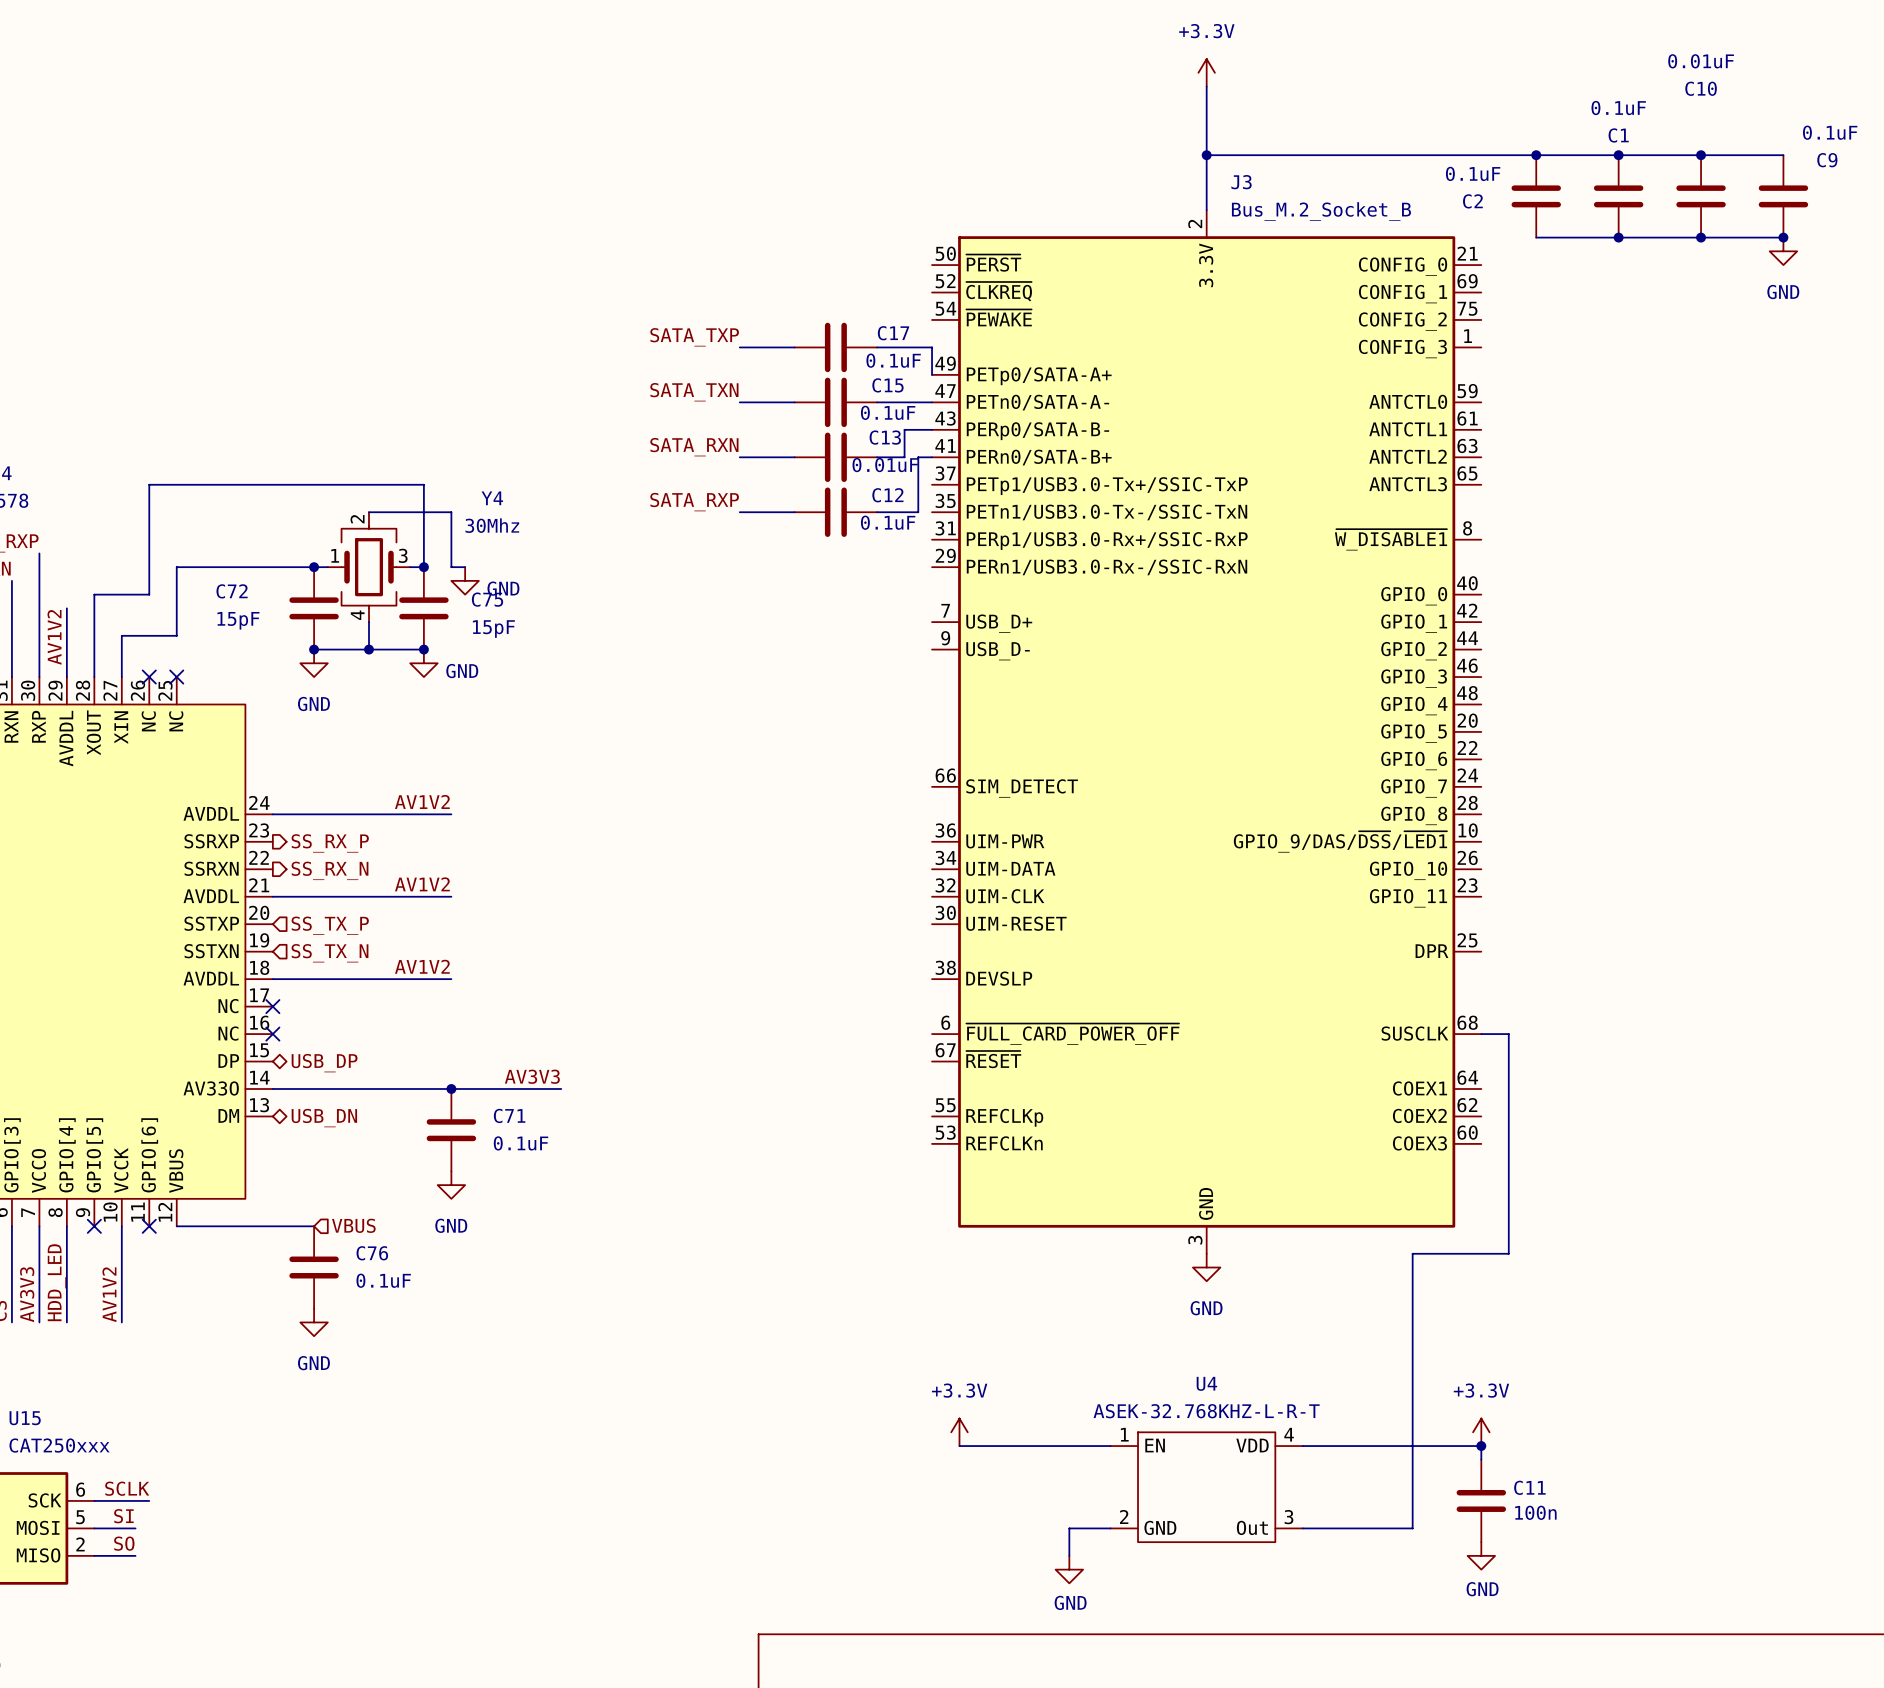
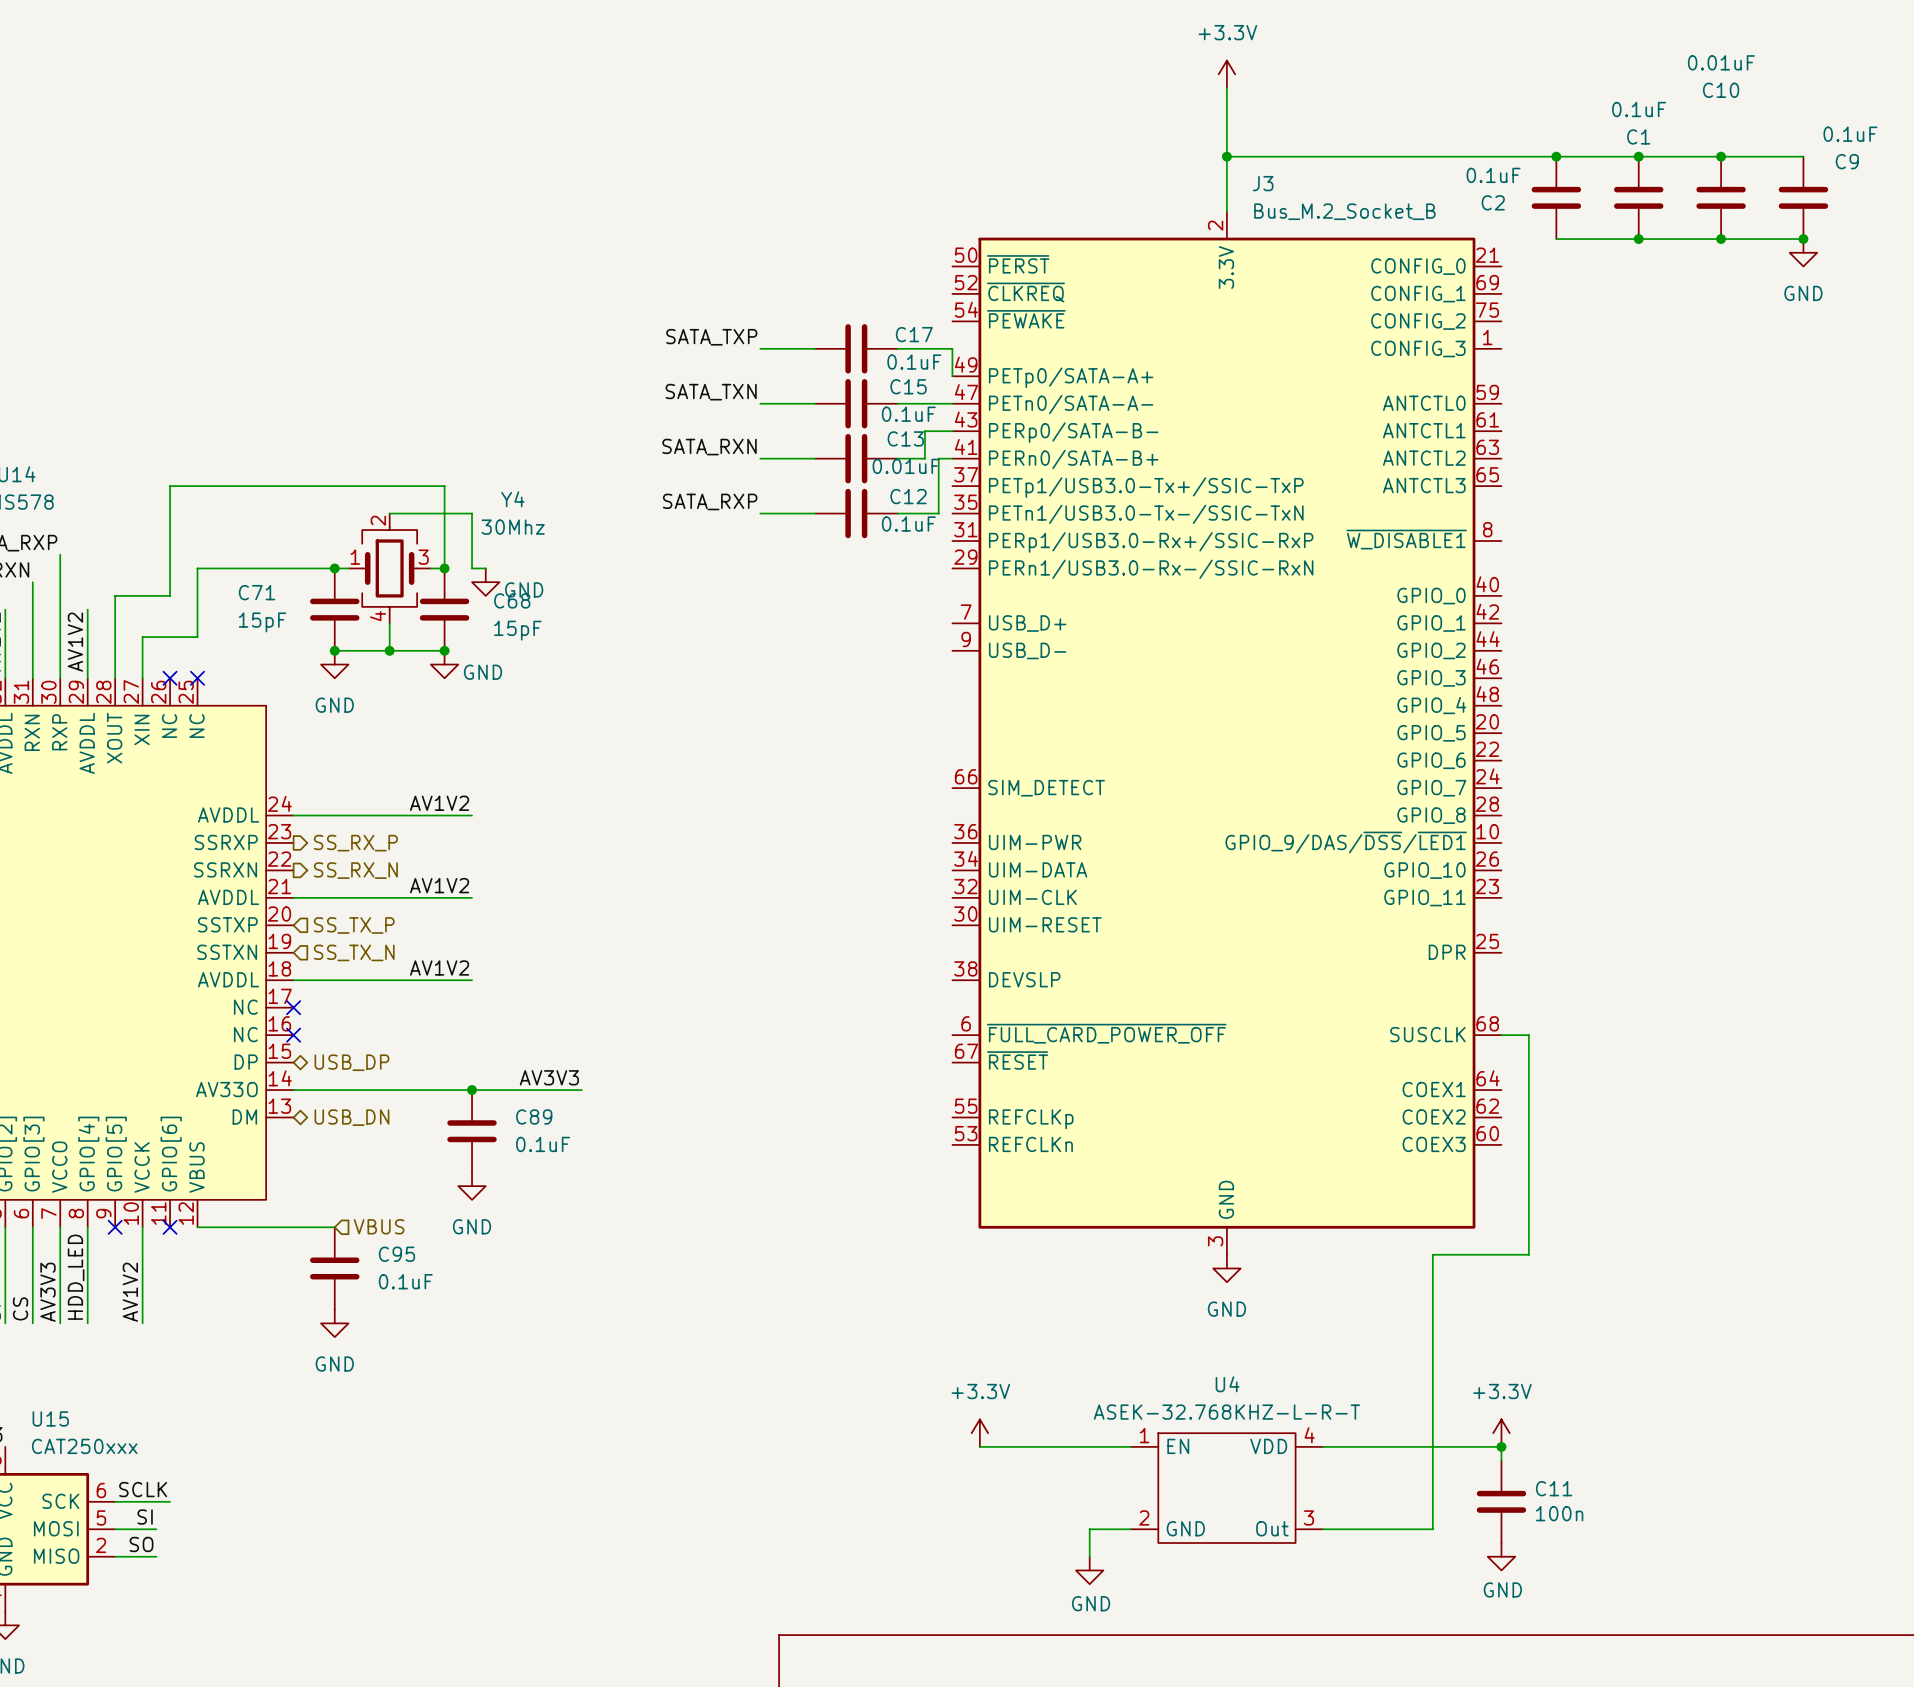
C72 name: C72 (232, 591) -> C71 (256, 592)
C75 name: C75 (487, 599) -> C68 (512, 600)
C71 name: C71 (509, 1115) -> C89 (534, 1116)
C76 name: C76 (372, 1253) -> C95 (396, 1254)

